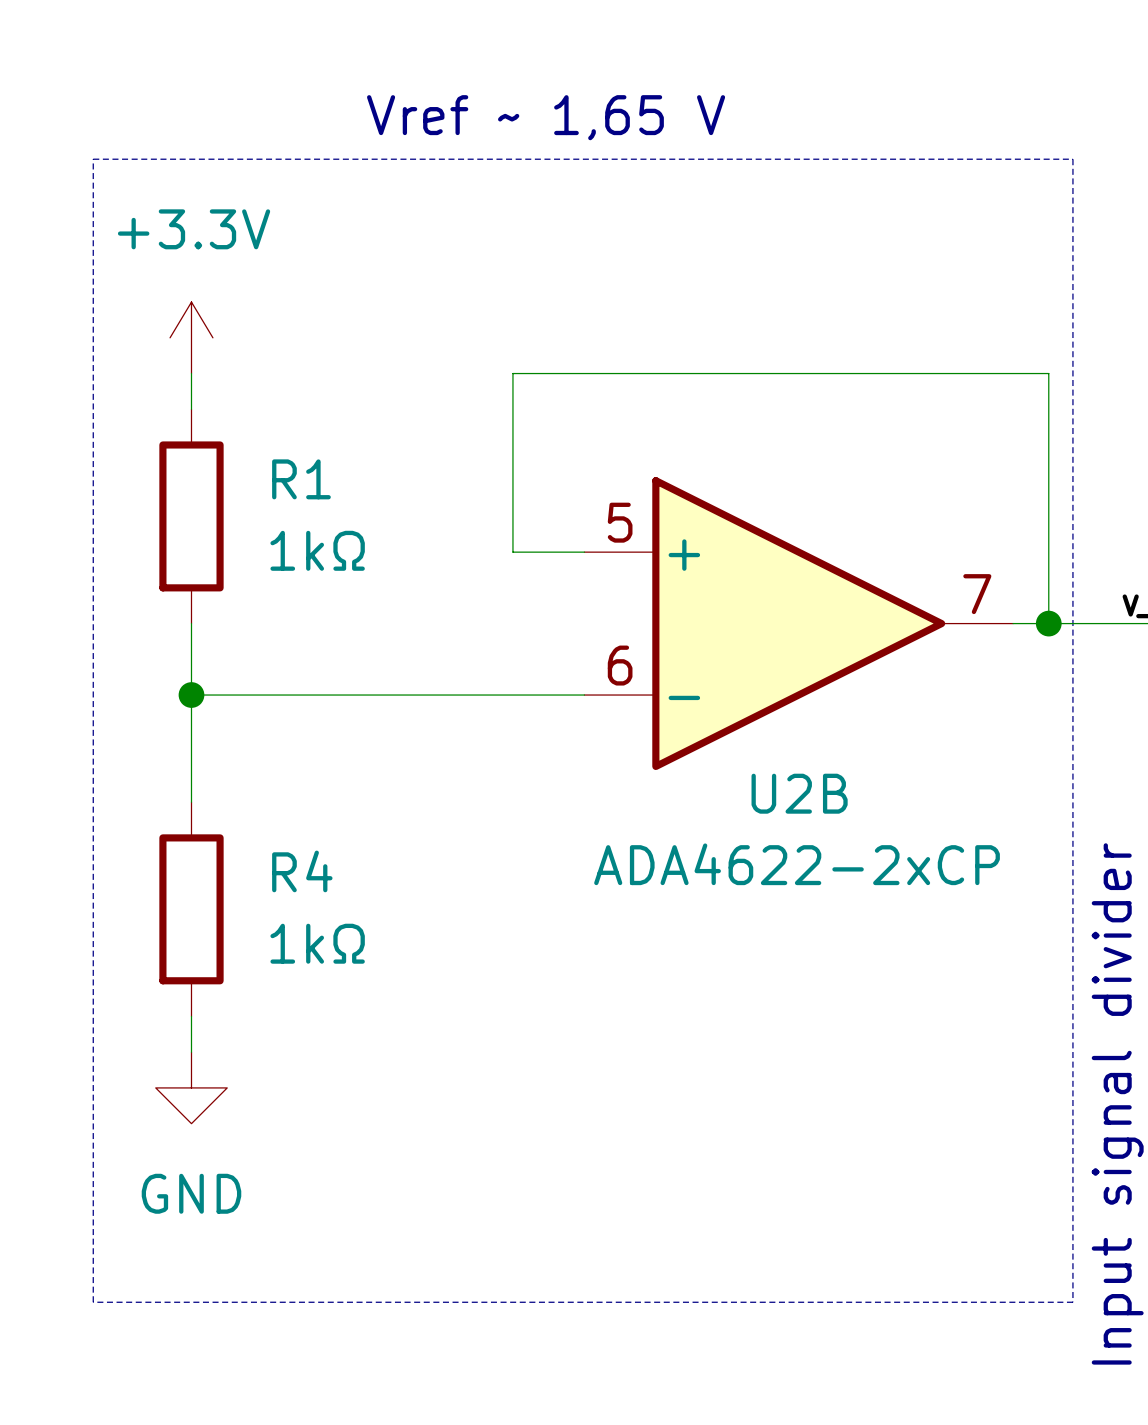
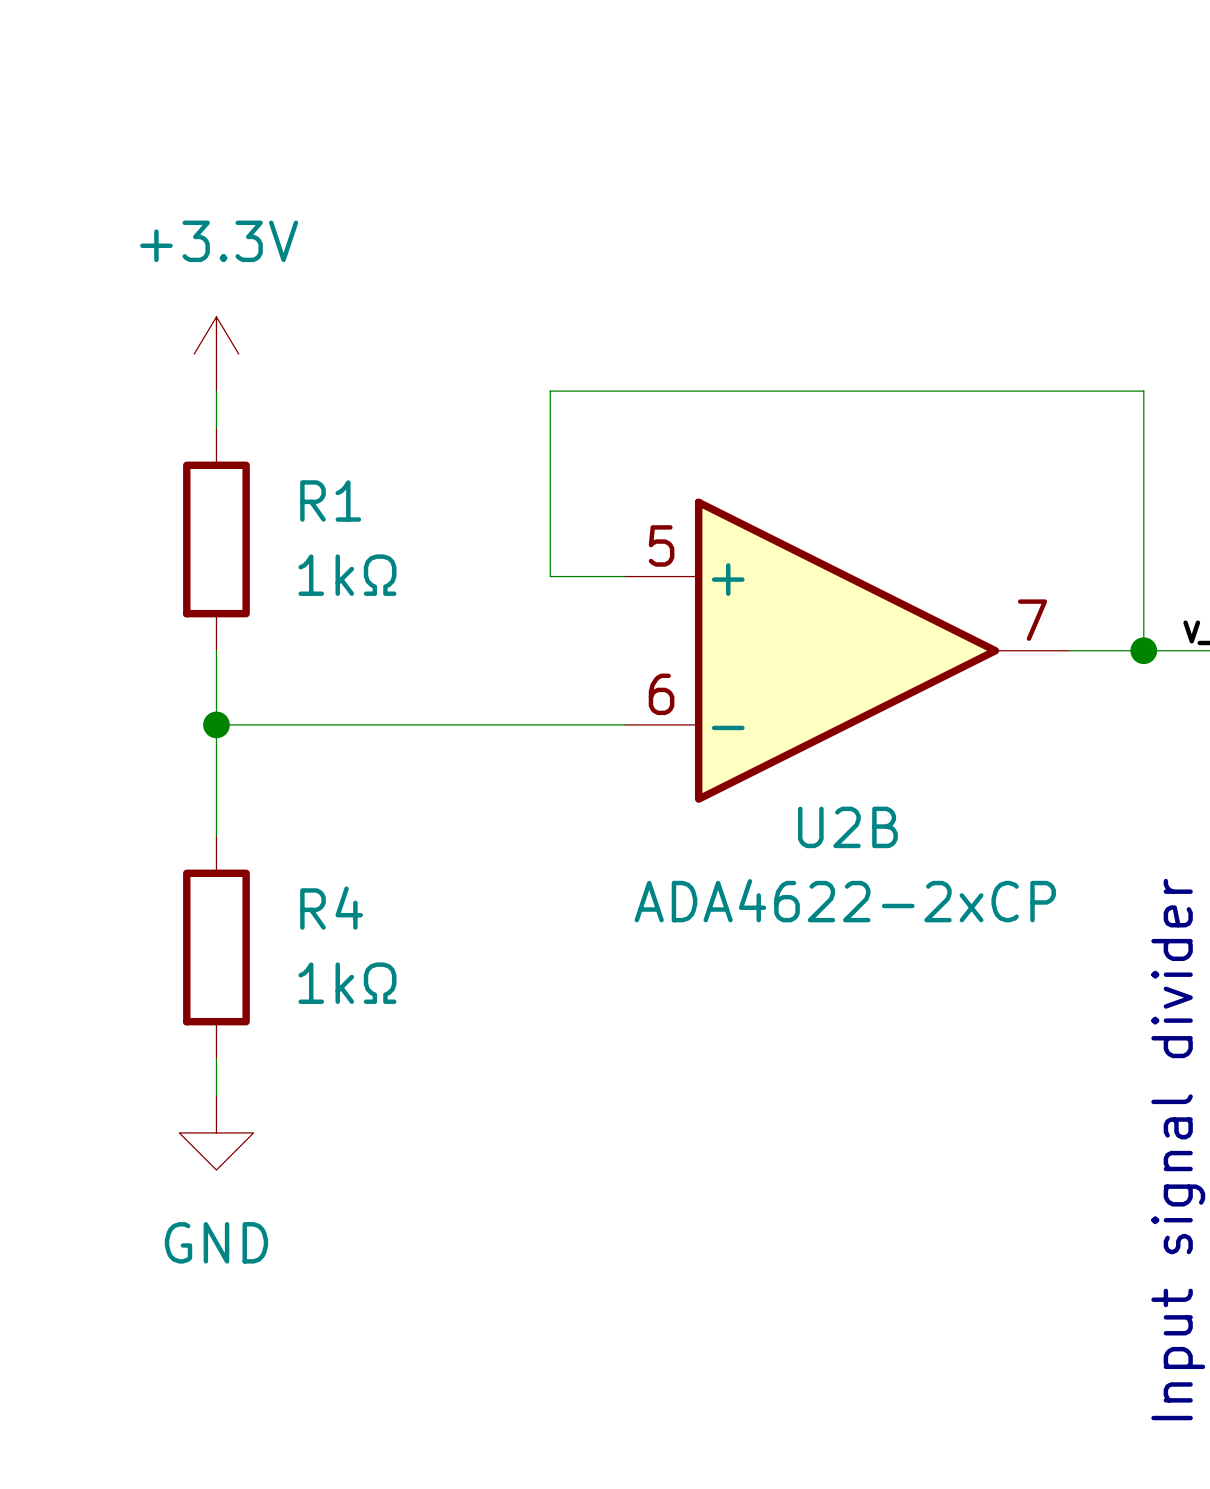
text: Vref ~ 1,65 V (546, 117) -> none
line: (93, 159) (1072, 159) (1072, 1302) (93, 1302) (93, 159) -> none
wire: (1048, 373) (1048, 623) -> (1106, 391) (1143, 391) (1143, 650)
junction position: (1048, 623) -> (1143, 650)

